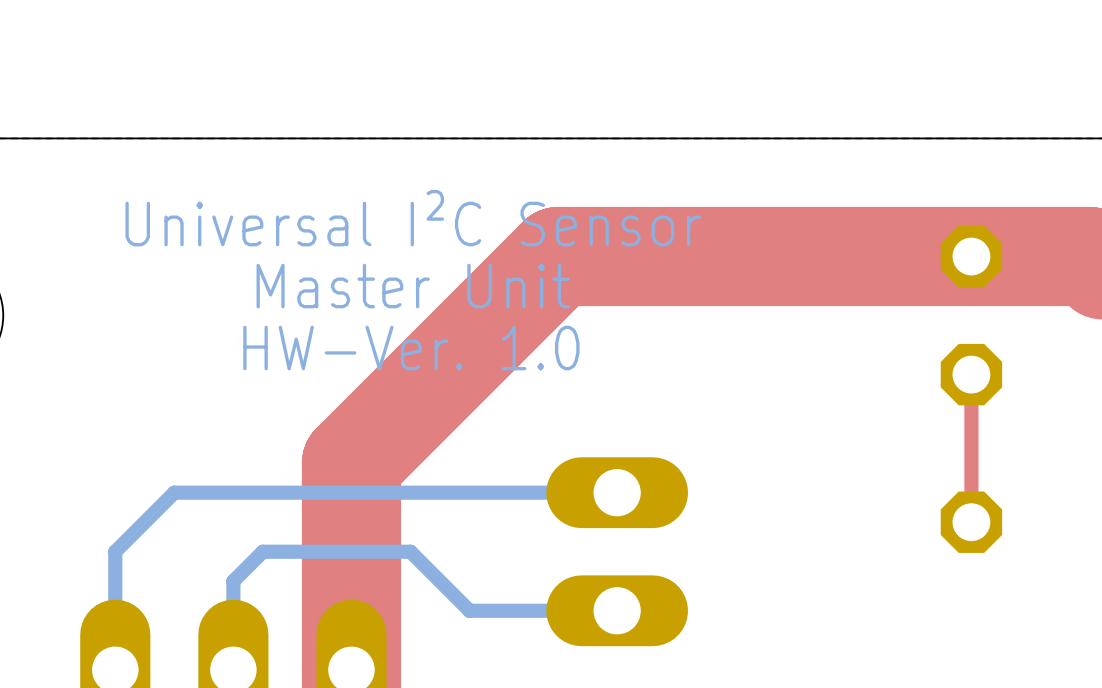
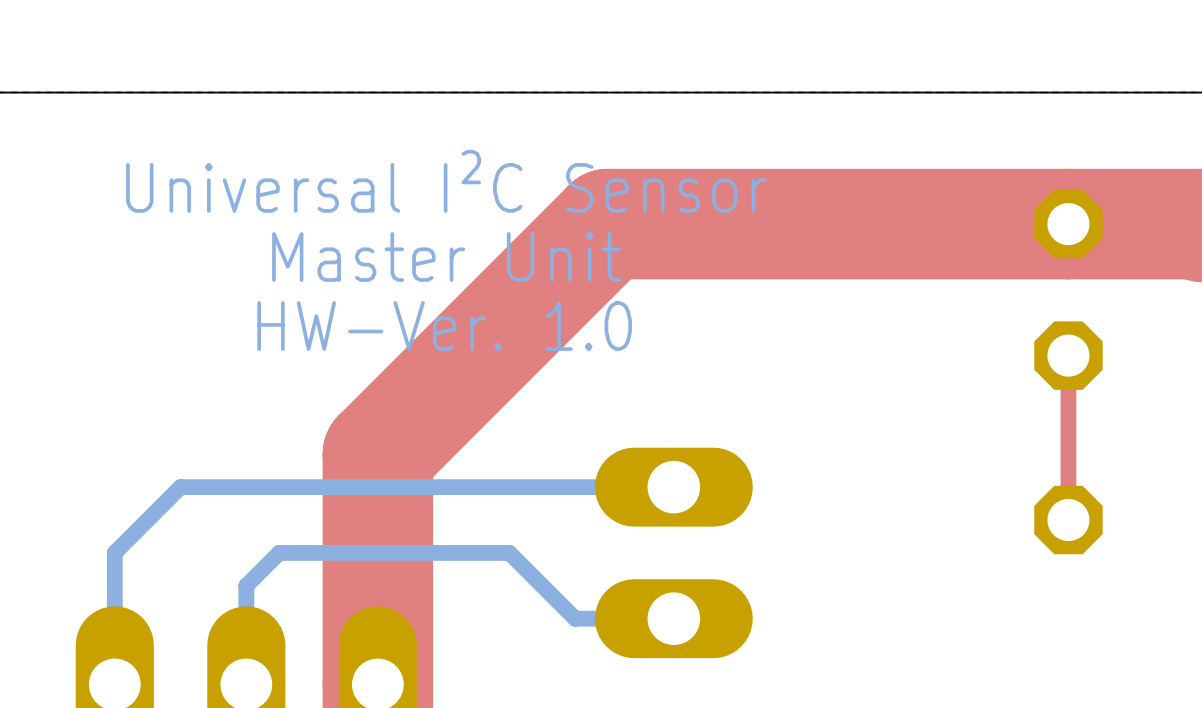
bottom track: (410, 551) (469, 610) (528, 610) -> (443, 552) (509, 552) (575, 618)

